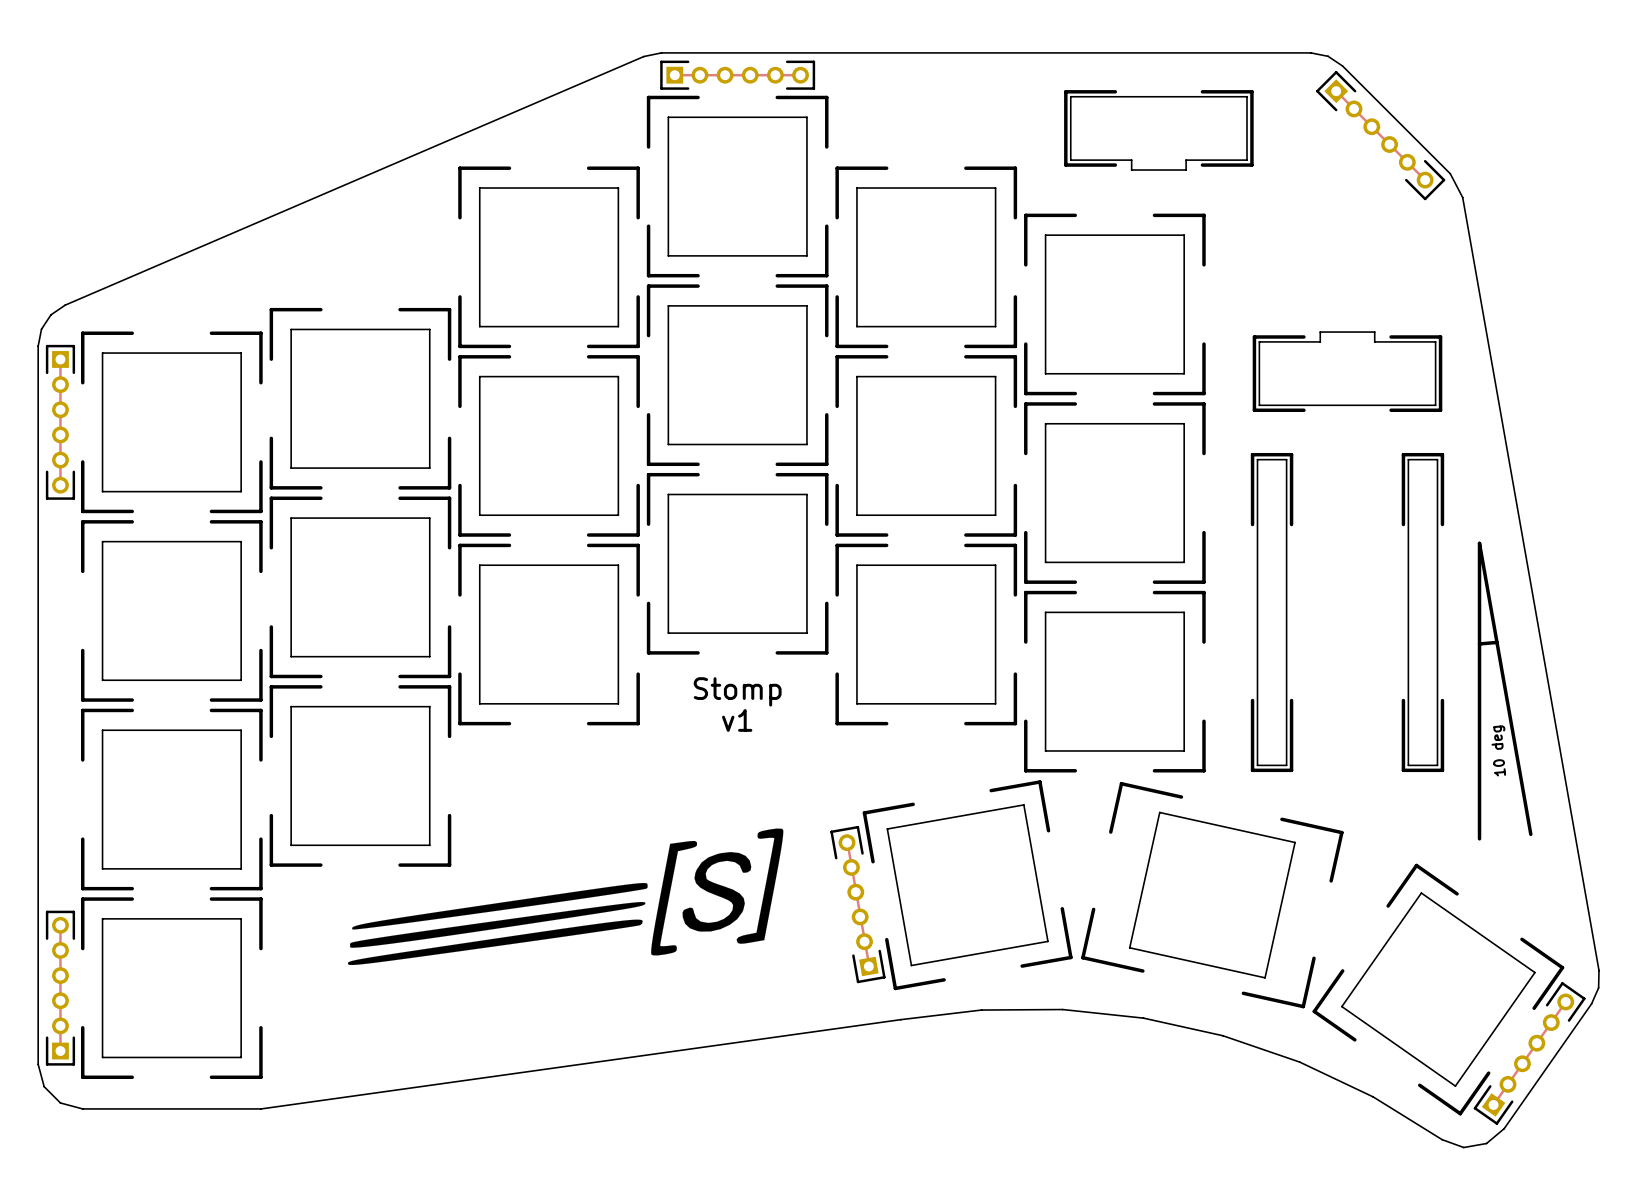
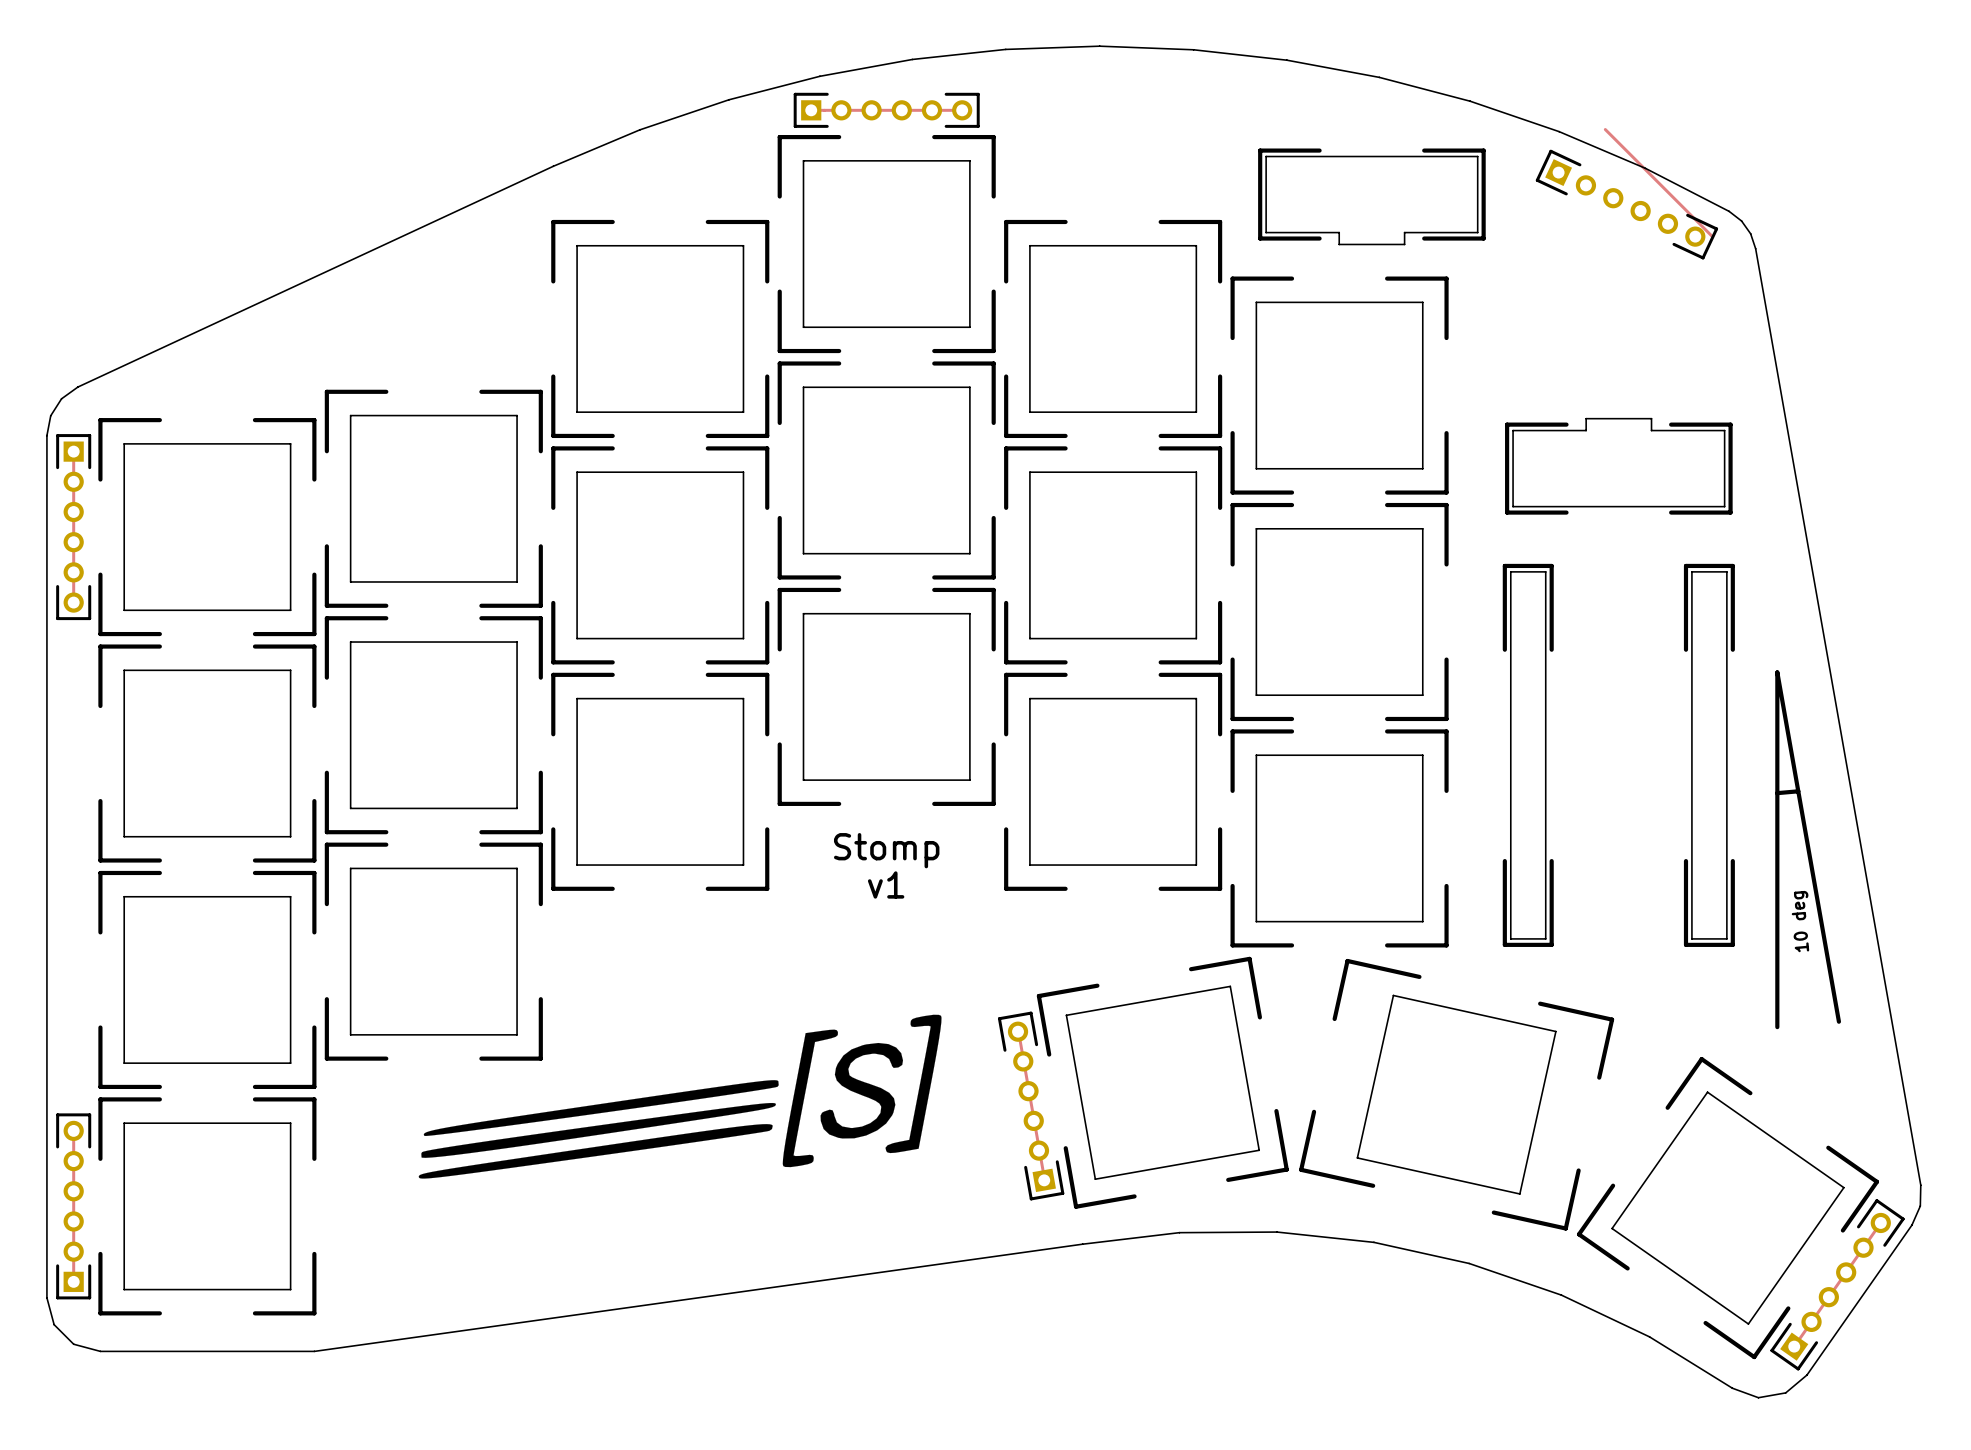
line: (1115, 91) (1065, 91) (1065, 165) (1115, 165) -> (1319, 150) (1260, 150) (1260, 238) (1319, 238)
line: (1202, 91) (1251, 91) (1251, 165) (1202, 165) -> (1424, 150) (1483, 150) (1483, 238) (1424, 238)
board edge: (1070, 96) (1070, 160) (1131, 160) (1131, 170) (1186, 170) (1186, 160) (1247, 160) (1247, 96) (1070, 96) -> (1266, 156) (1266, 232) (1339, 232) (1339, 244) (1404, 244) (1404, 232) (1477, 232) (1477, 156) (1266, 156)
part: (1380, 135) -> none
part: none -> (1626, 204)
board edge: (1462, 197) (1450, 173) (1342, 65) (1328, 56) (1311, 52) (661, 52) (643, 56) (65, 305) (50, 314) (41, 329) (38, 346) -> (1757, 257) (1750, 233) (1741, 221) (1729, 211) (1645, 168) (1559, 131) (1470, 101) (1379, 77) (1286, 60) (1193, 49) (1099, 46) (1005, 49) (912, 59) (819, 76) (728, 99) (639, 129) (553, 166) (77, 387) (61, 398) (50, 415) (46, 435)

